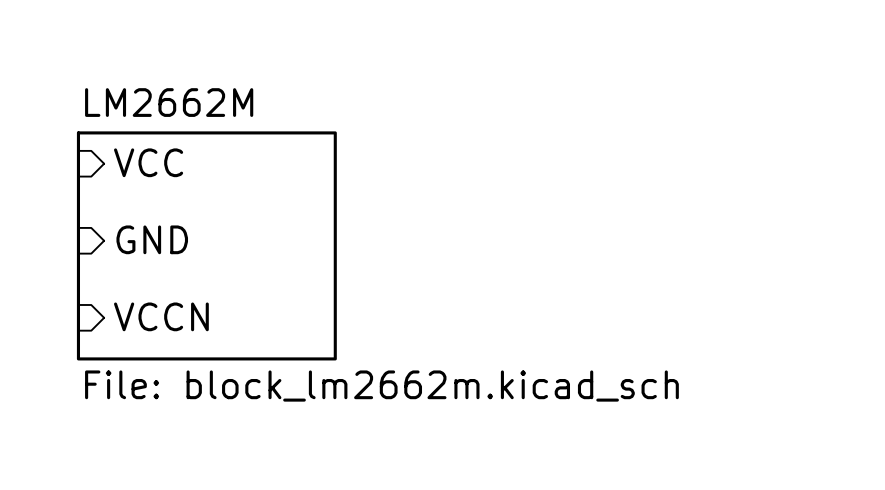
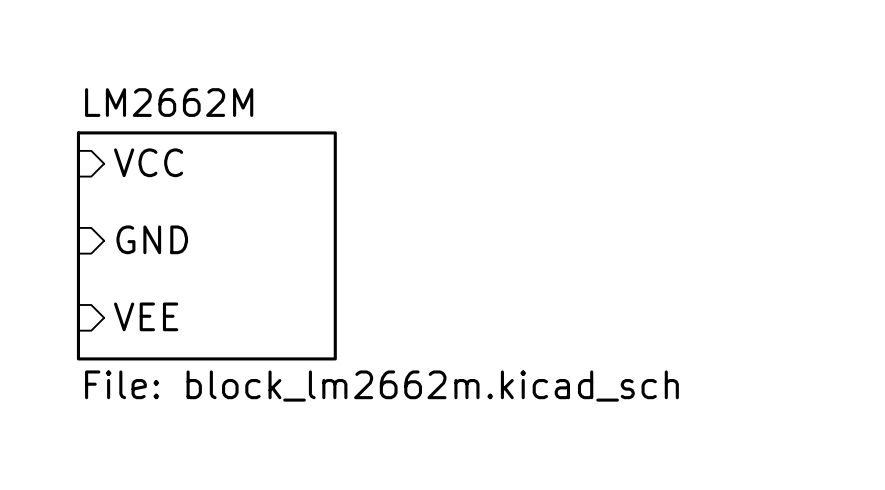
sheet pin: VCCN (161, 316) -> VEE (146, 316)

